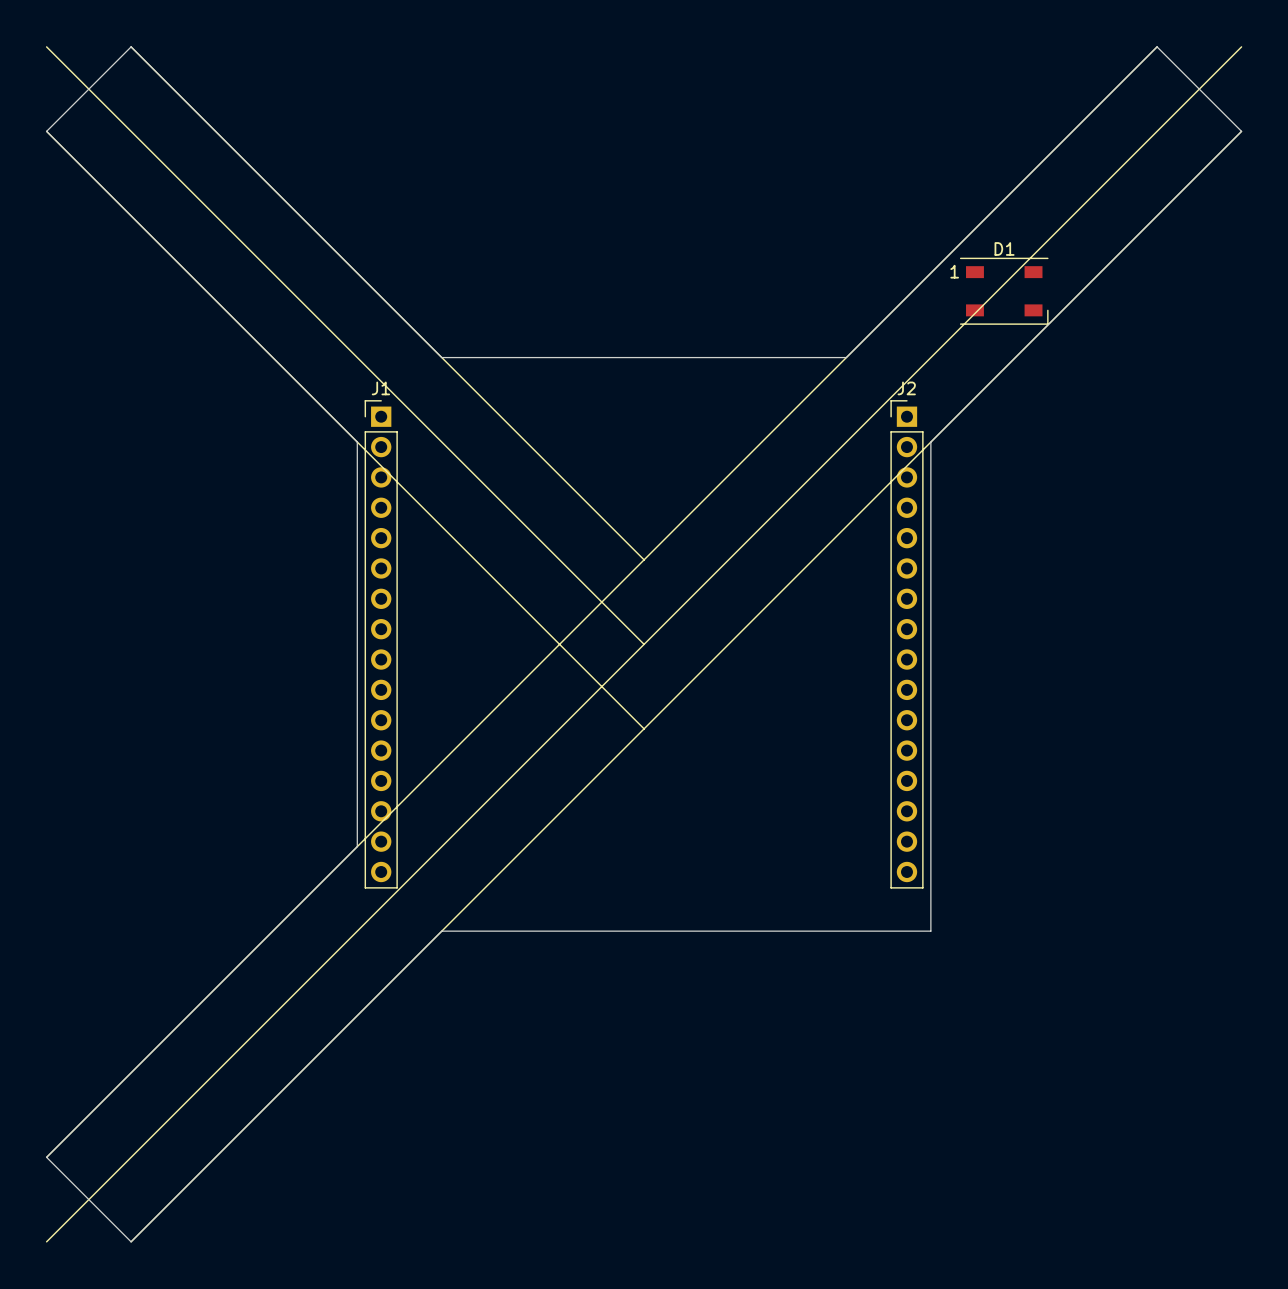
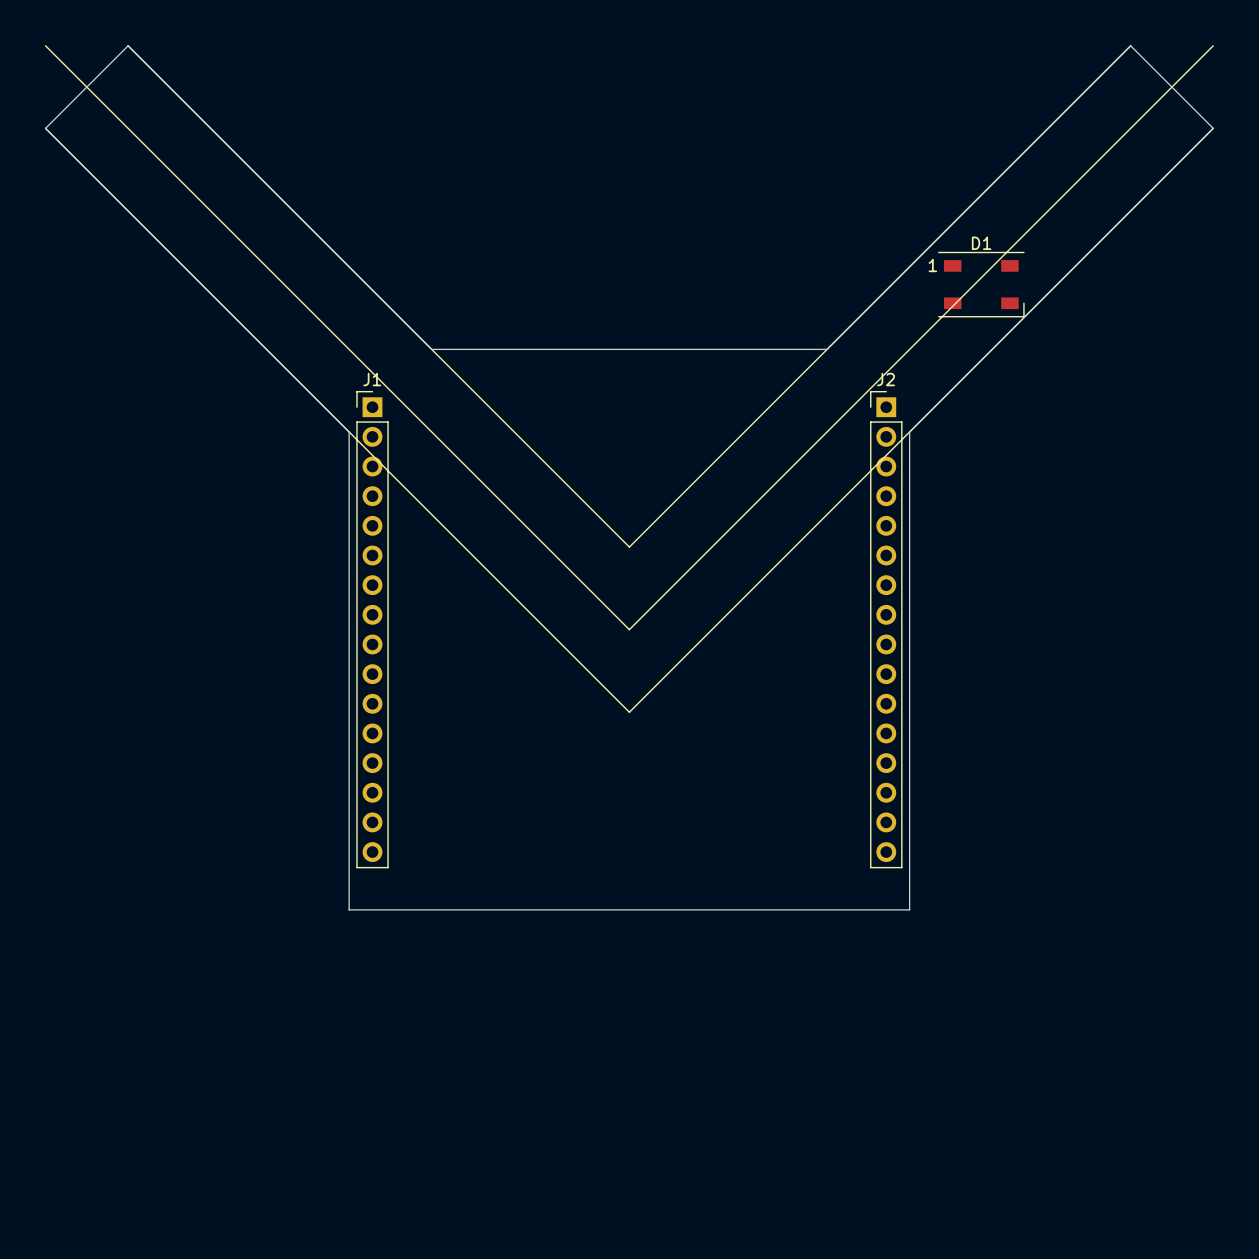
line: (644, 559) (46, 1157) -> none
line: (644, 644) (46, 1241) -> none
line: (644, 728) (131, 1241) -> none
board edge: (357, 846) (46, 1157) (131, 1241) (441, 931) -> (349, 827) (349, 909) (431, 909)

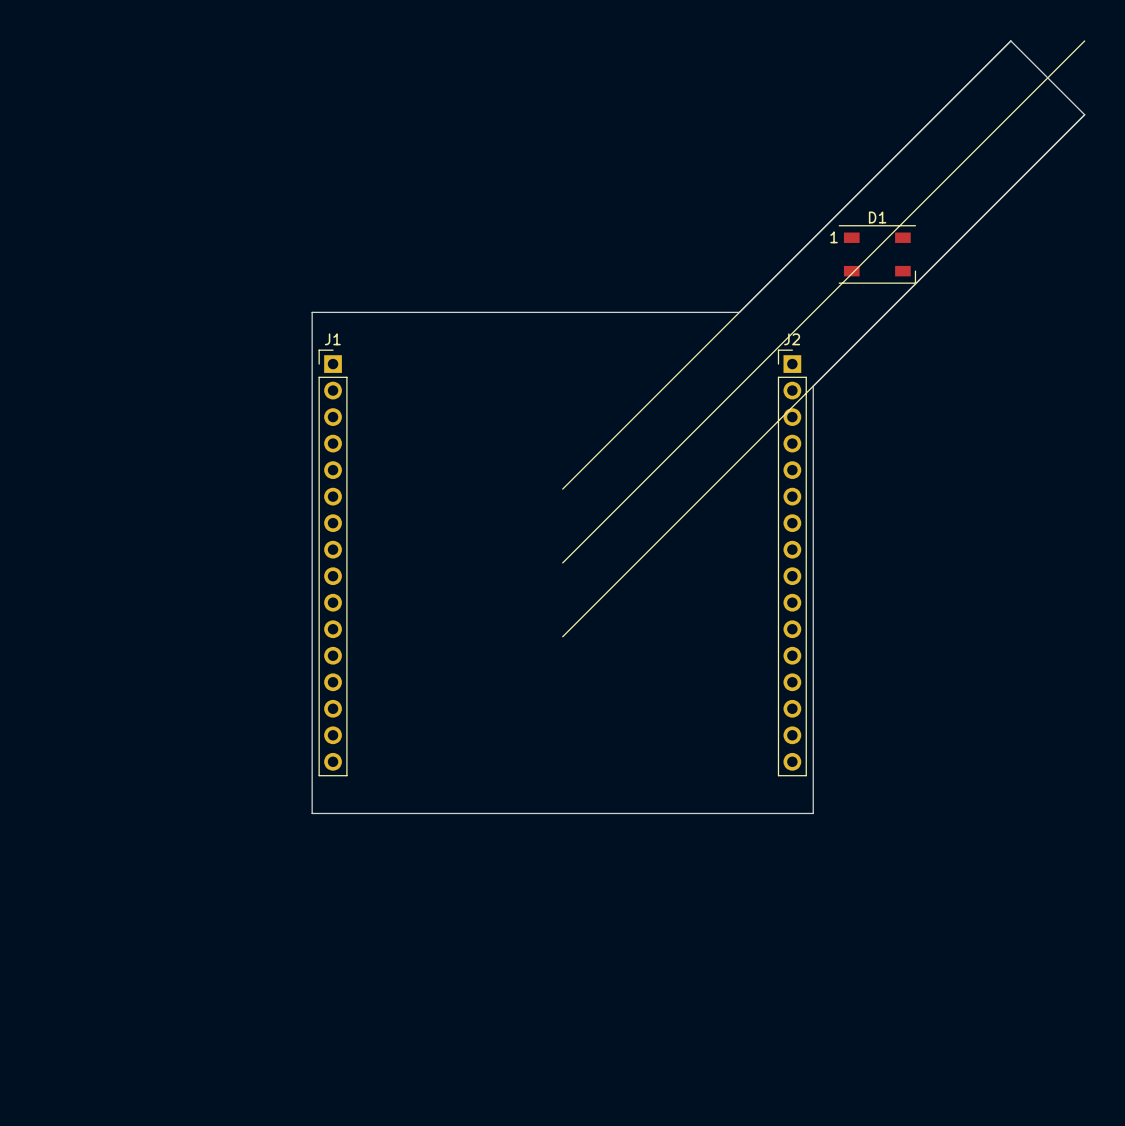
line: (45, 45) (629, 629) -> none
line: (128, 45) (629, 547) -> none
line: (45, 128) (629, 712) -> none
board edge: (431, 349) (128, 45) (45, 128) (349, 431) -> (385, 312) (312, 312) (312, 386)

